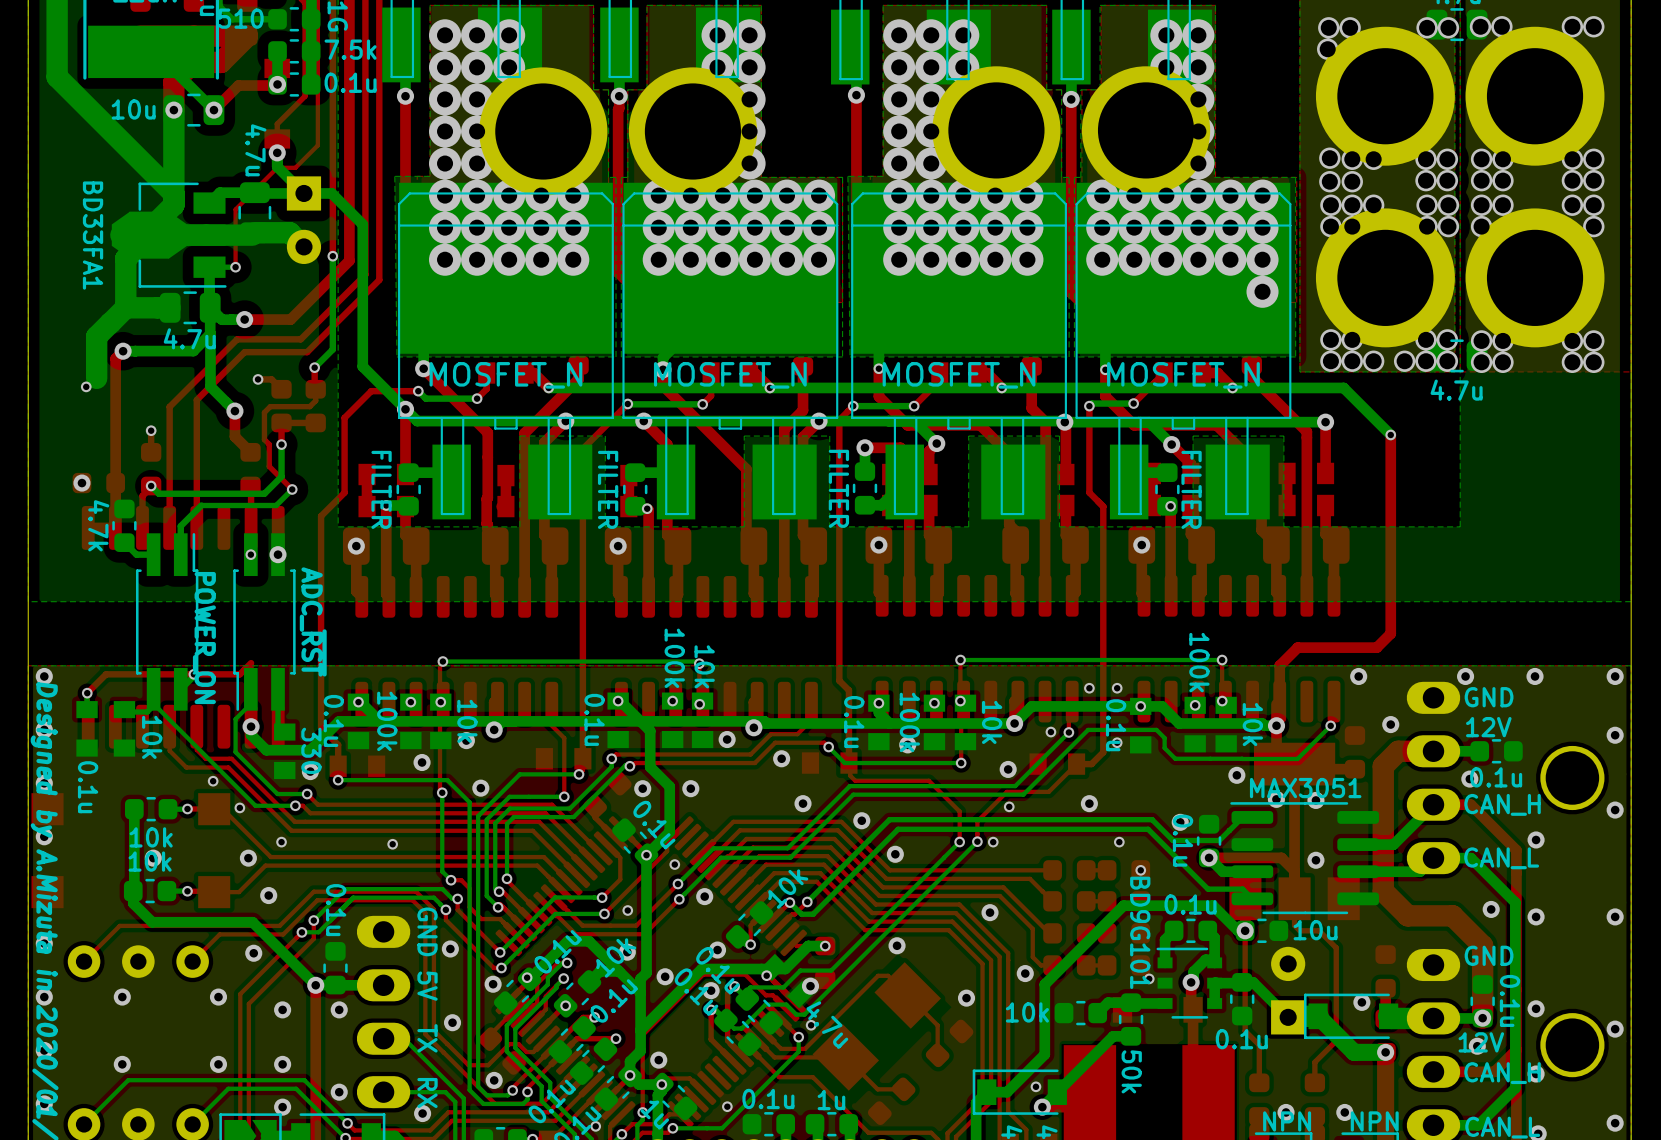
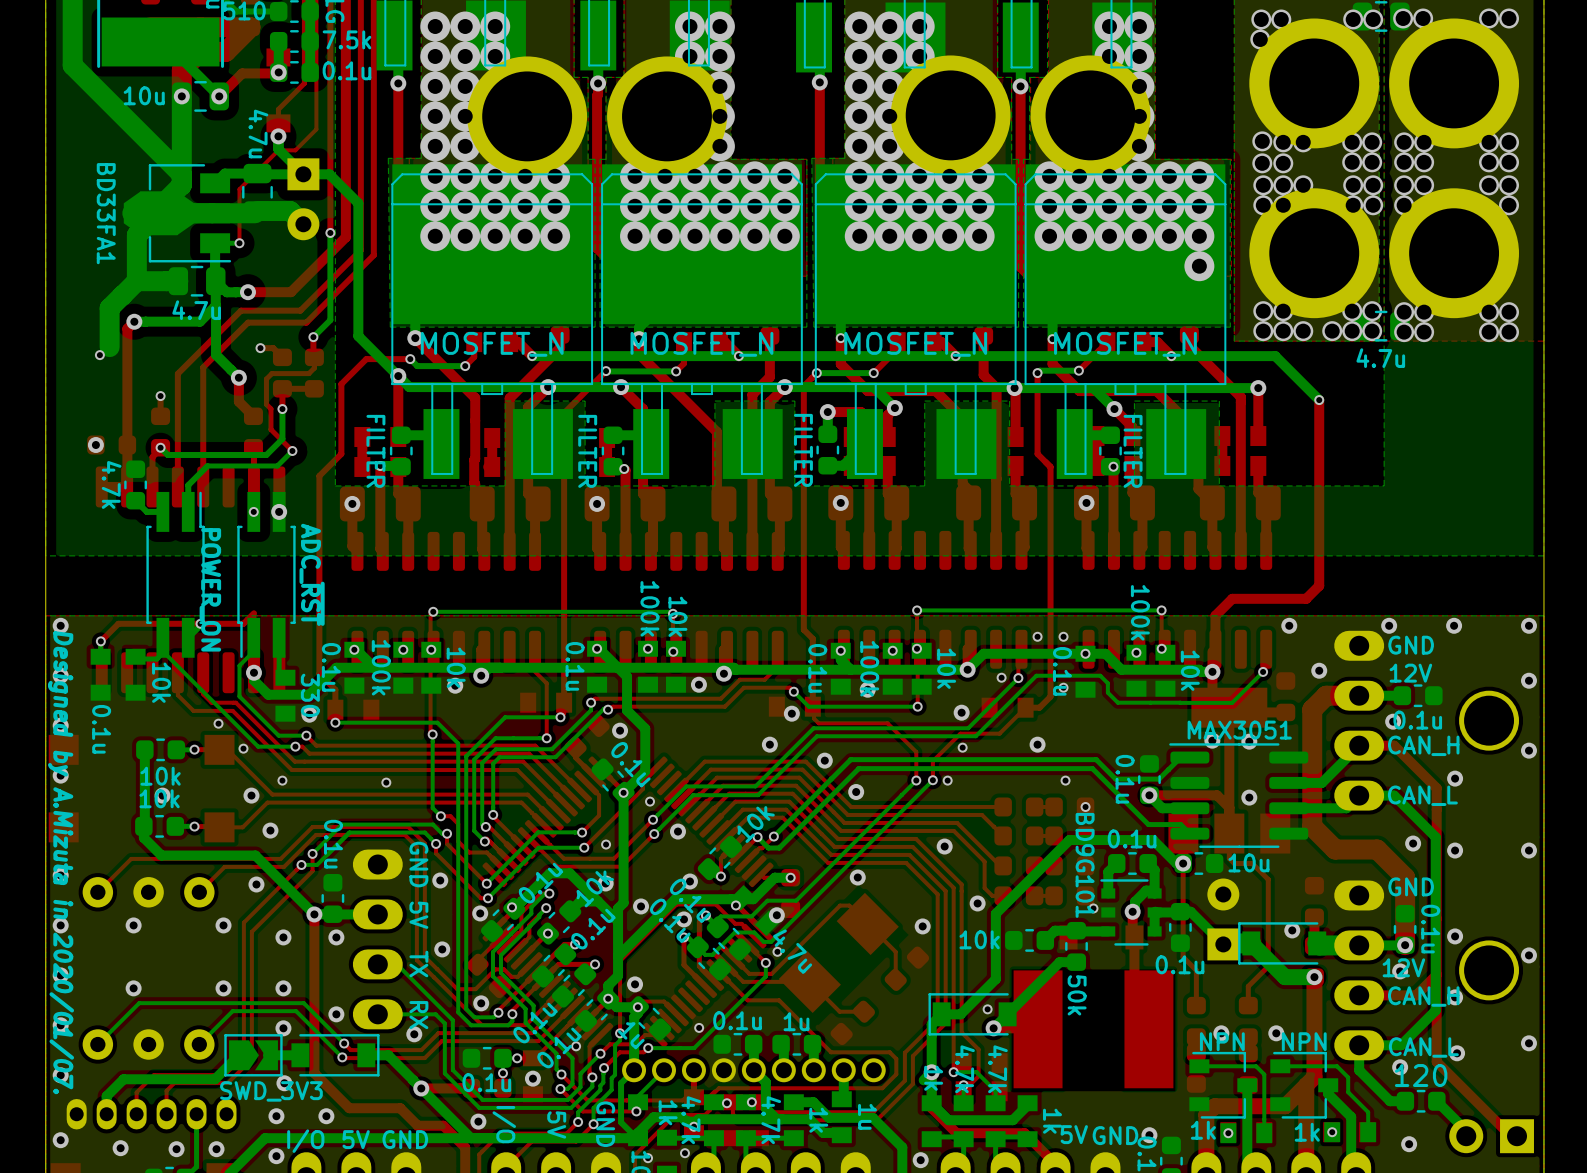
via position: (781, 758) -> (791, 713)
via: (422, 762) -> none
via: (1236, 775) -> none
via: (480, 788) -> none
via: (690, 788) -> none
via: (1180, 822) -> none

